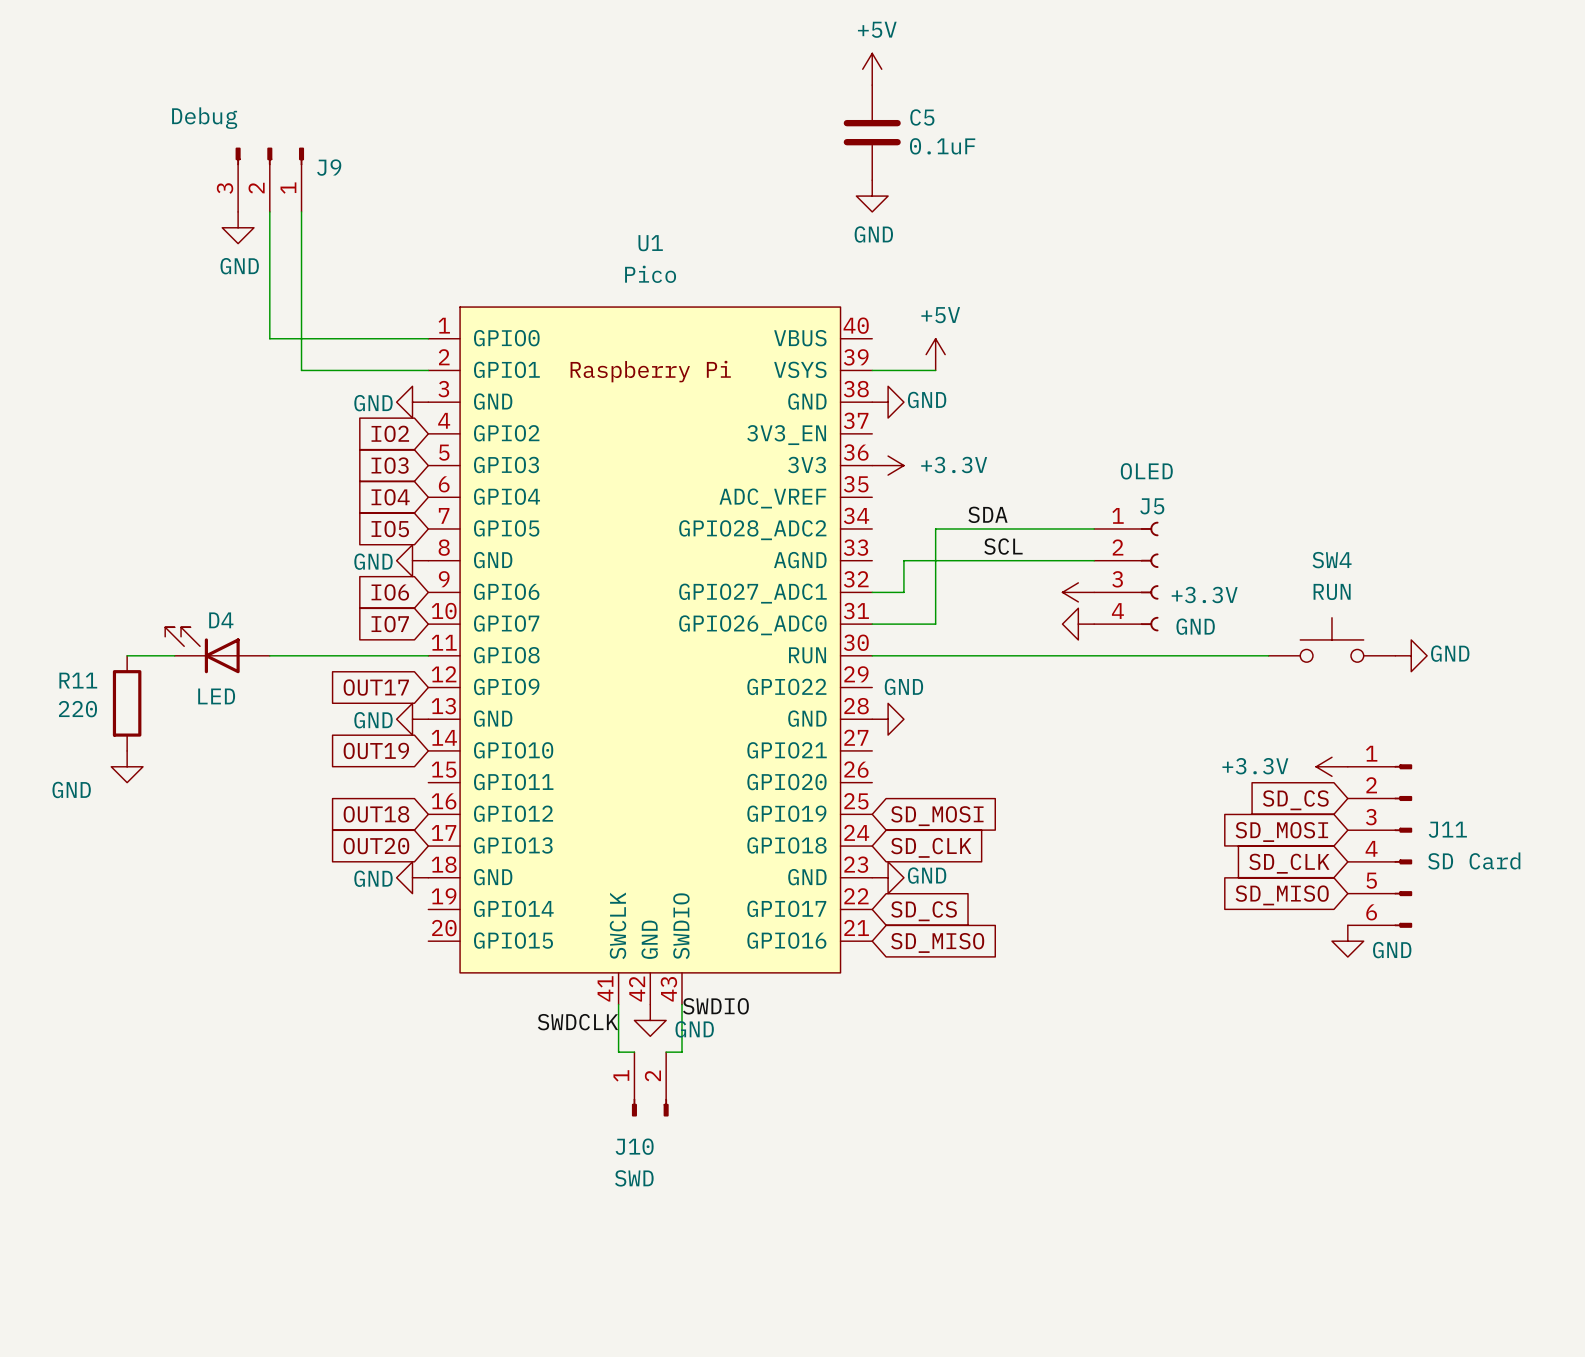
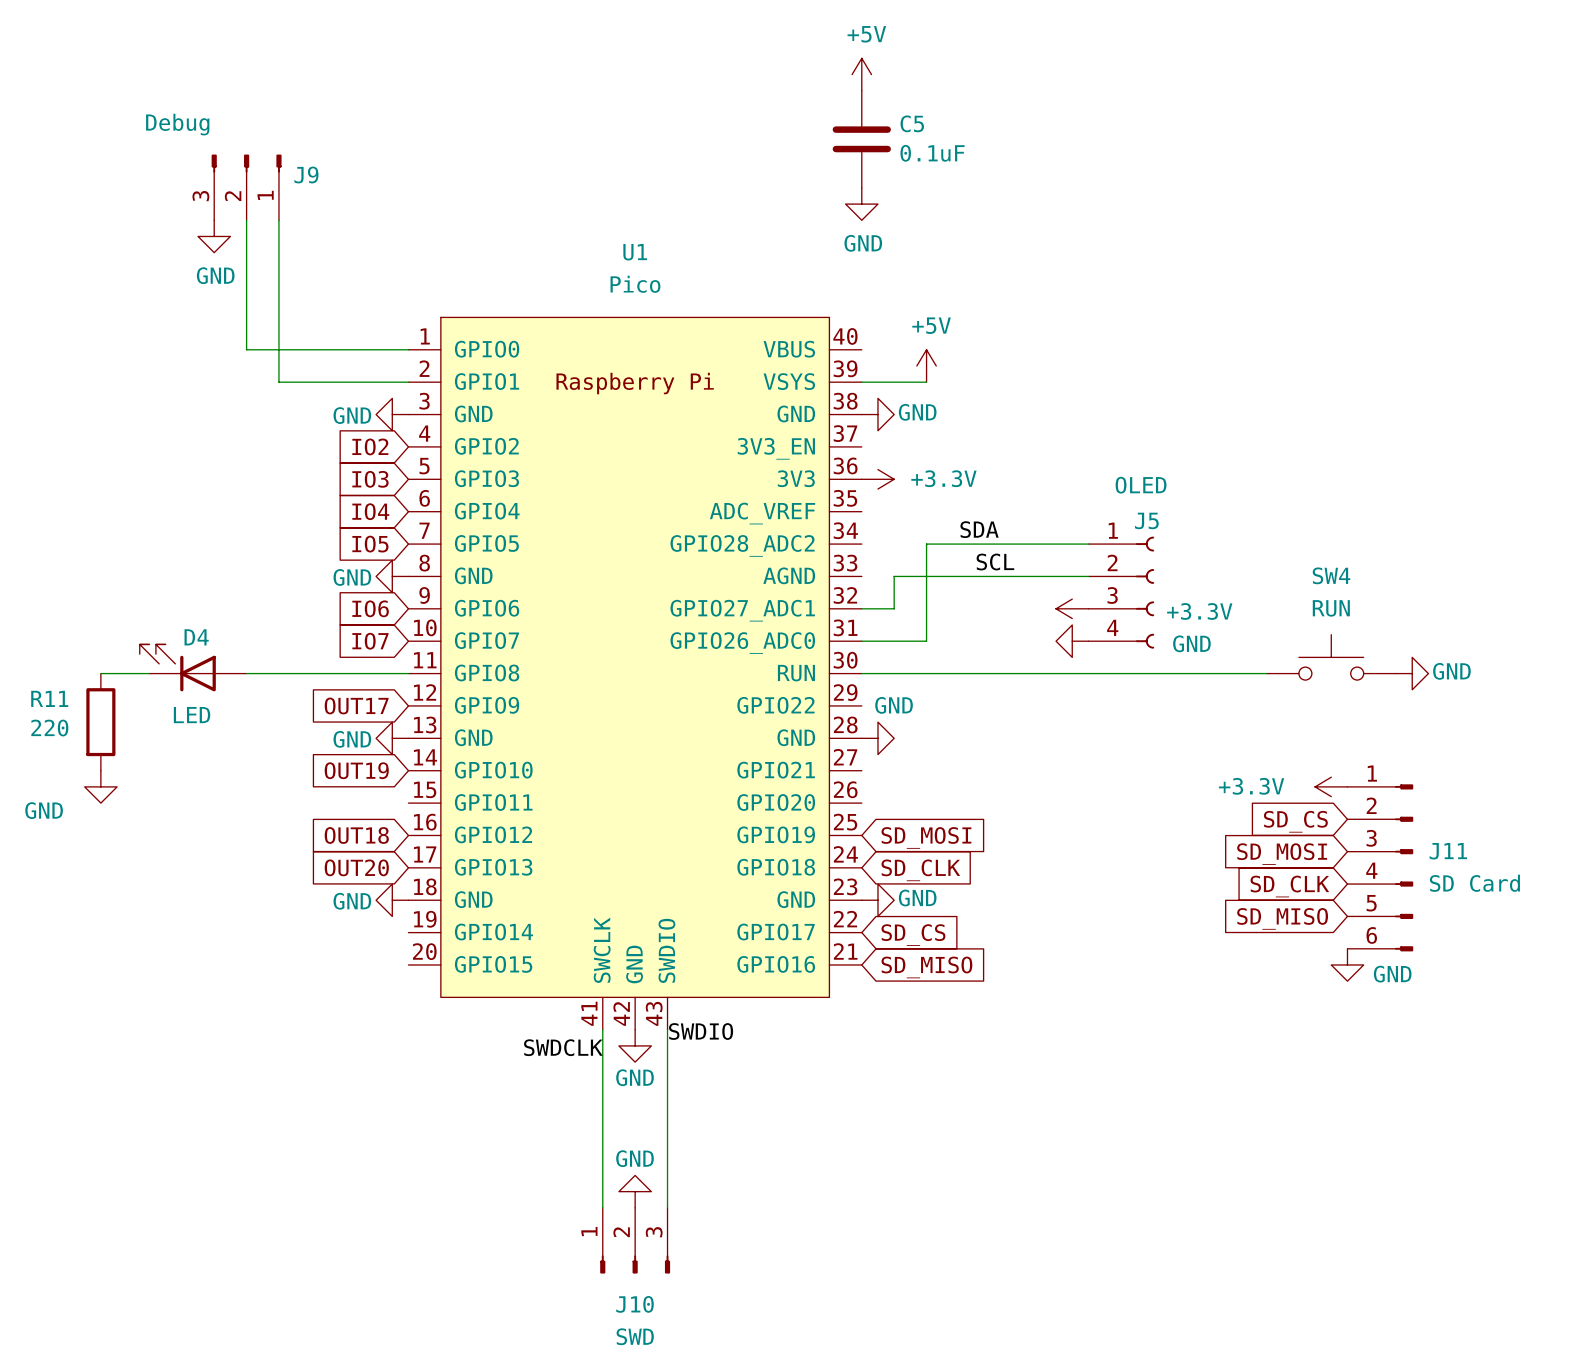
power symbol text position: GND (694, 1029) -> GND (635, 1077)
wire: (618, 1052) (634, 1052) -> (602, 1078) (602, 1207)
J10 symbol: [631, 1052, 669, 1117] -> [600, 1207, 671, 1274]
wire: (666, 1052) (682, 1052) -> (667, 1207) (667, 1078)
power symbol: none -> GND (635, 1191)

